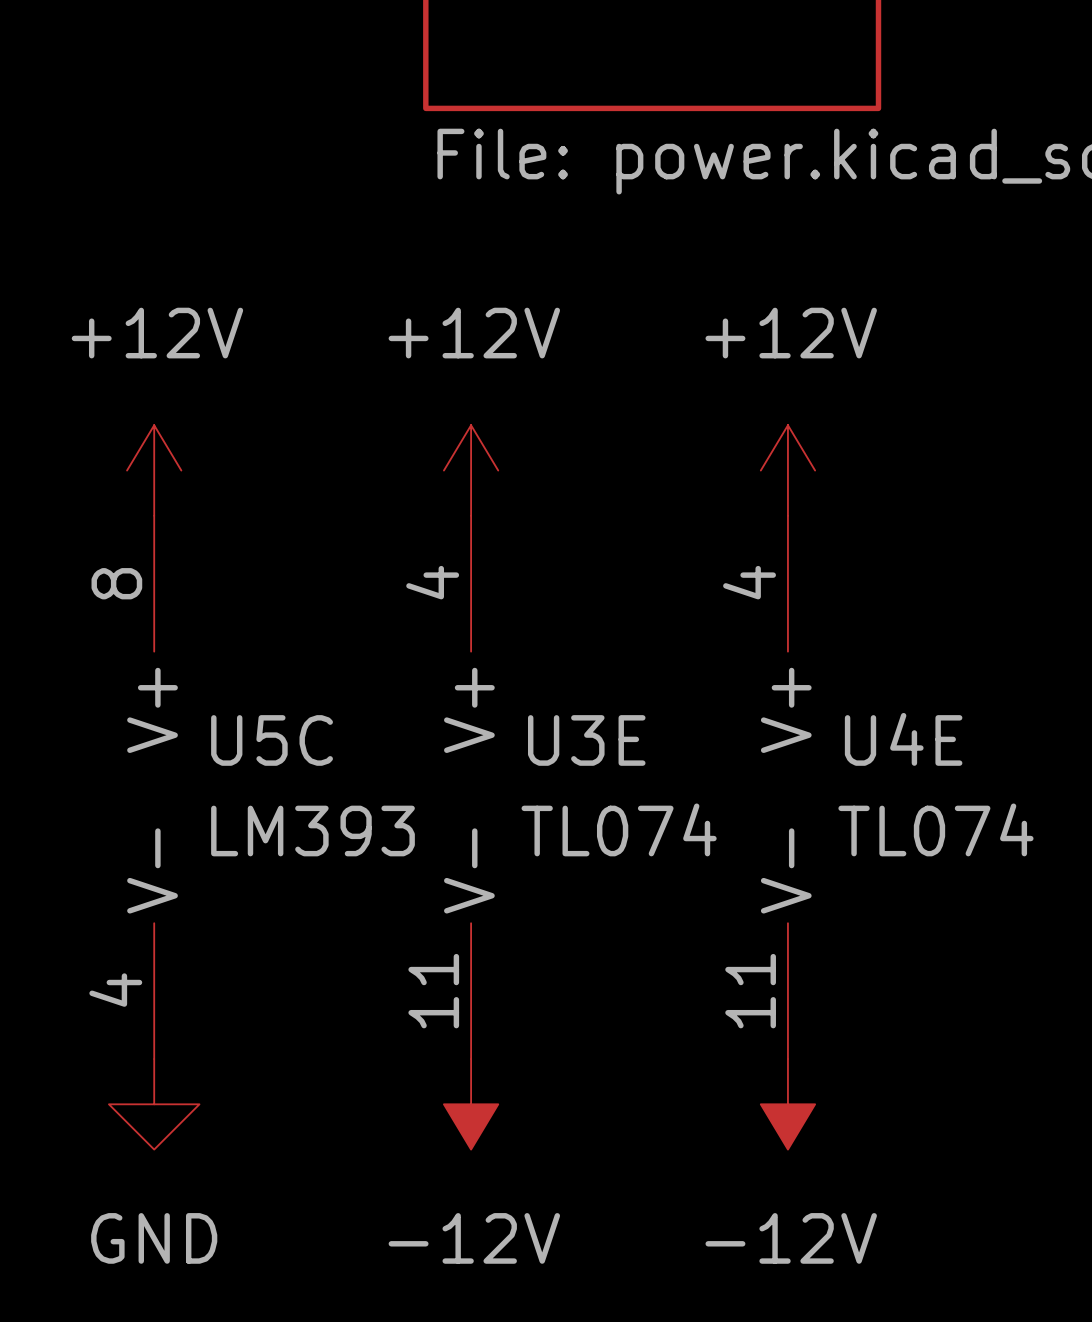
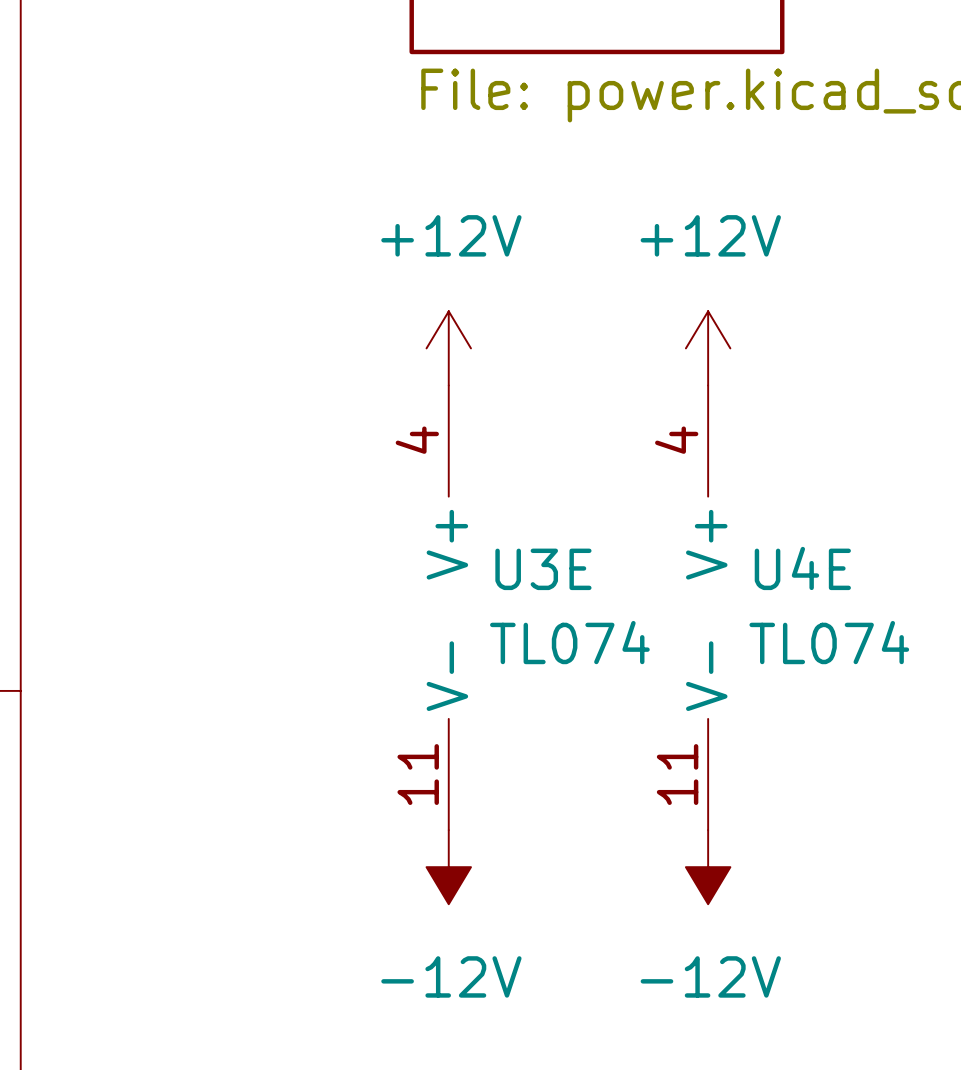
power symbol: +12V (154, 470) -> none
U5C: LM393 (154, 787) -> none
power symbol: GND (154, 1104) -> none

